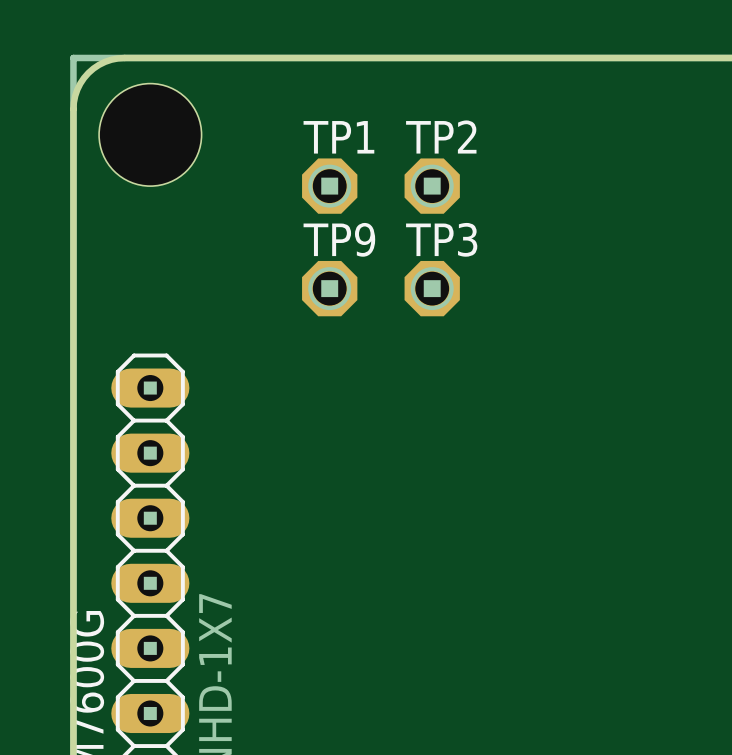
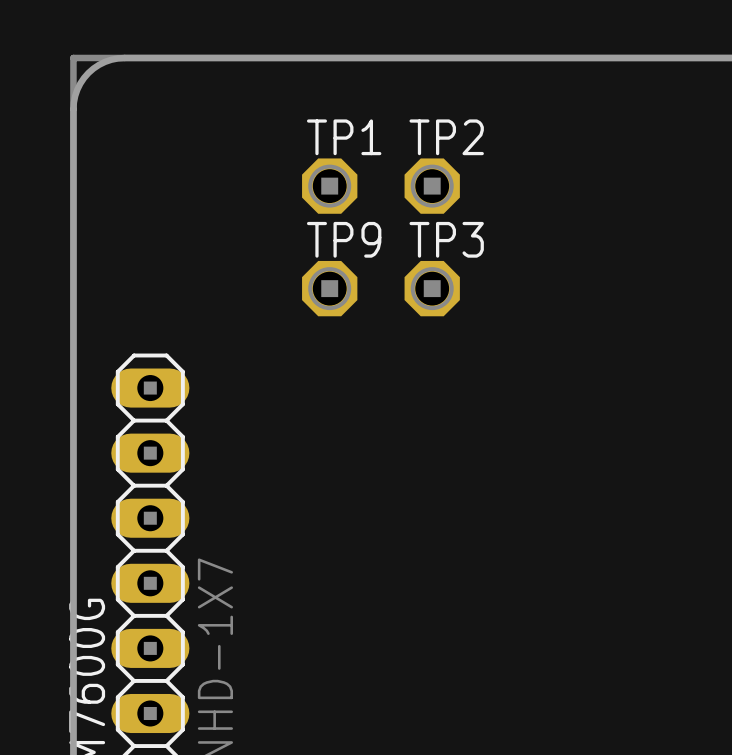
hole: (150, 134) -> none

